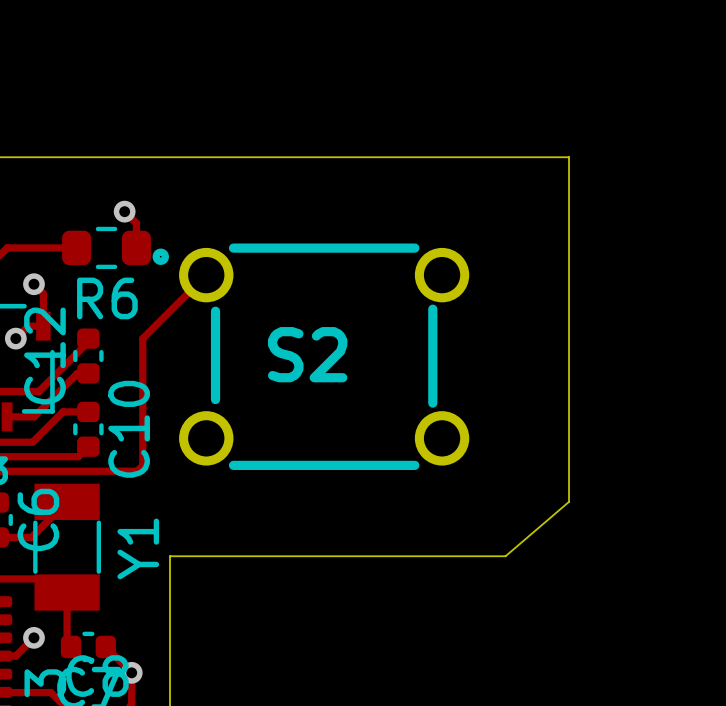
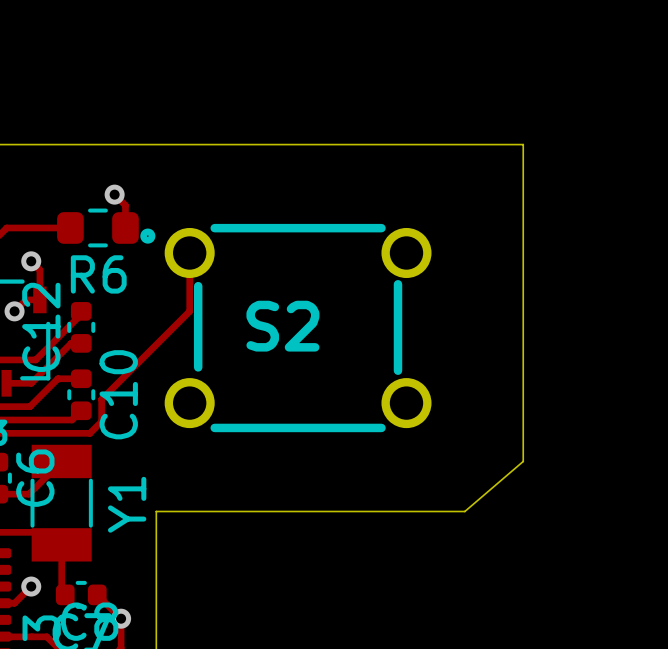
track: (206, 275) (142, 338) (142, 465) (137, 471) (97, 471) -> (189, 252) (189, 311) (101, 399) (101, 421) (89, 433)

